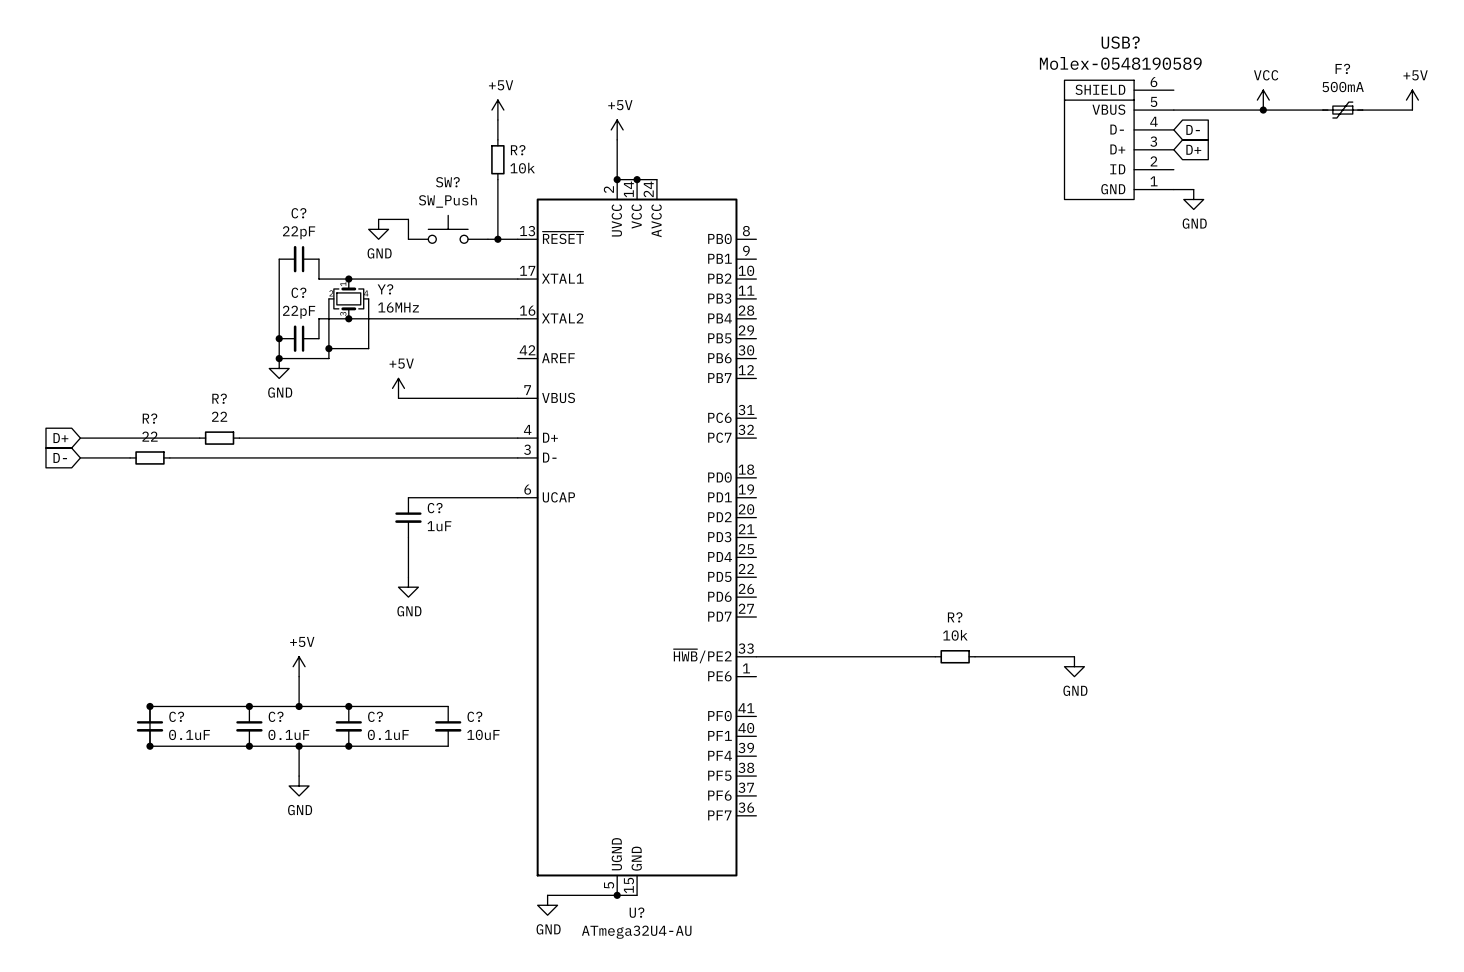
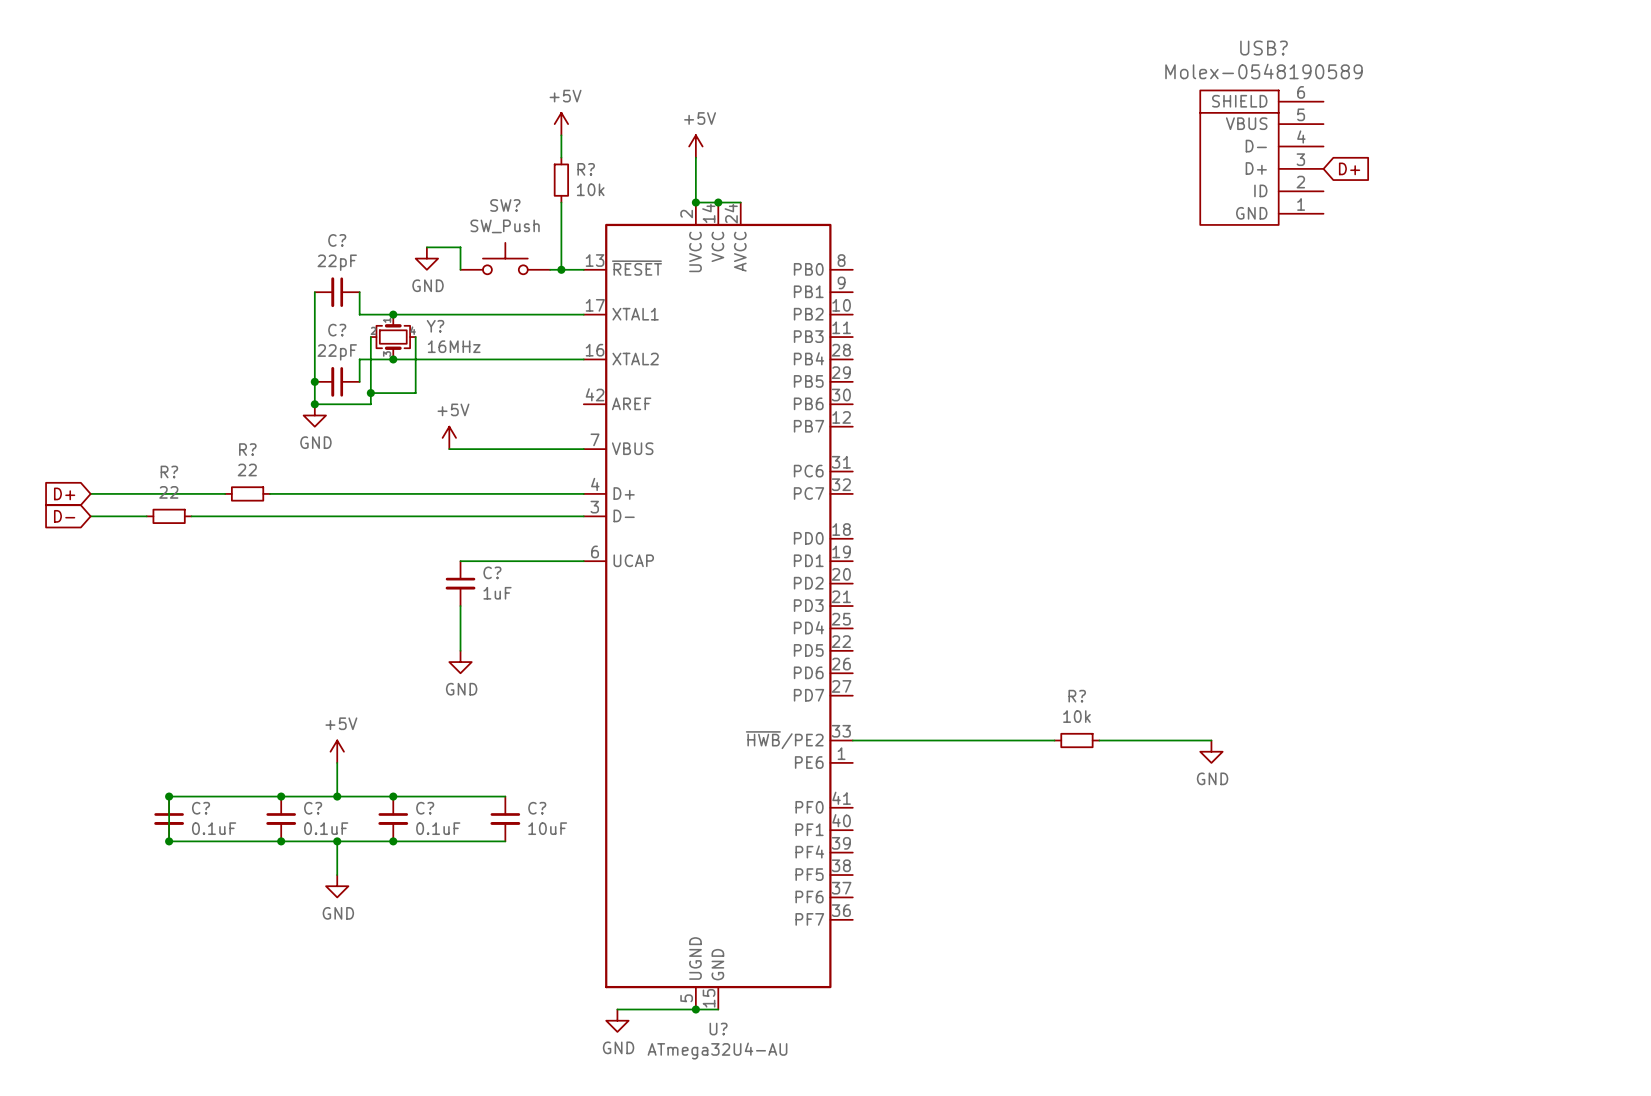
power symbol: VCC (1263, 100) -> none
power symbol: +5V (1412, 100) -> none
wire: (1173, 110) (1322, 110) -> none
junction: (1263, 110) -> none
F?: 500mA (1342, 110) -> none
wire: (1362, 110) (1412, 110) -> none
global label: D- (1193, 129) -> none
wire: (1173, 189) (1193, 189) -> none
power symbol: GND (1193, 199) -> none

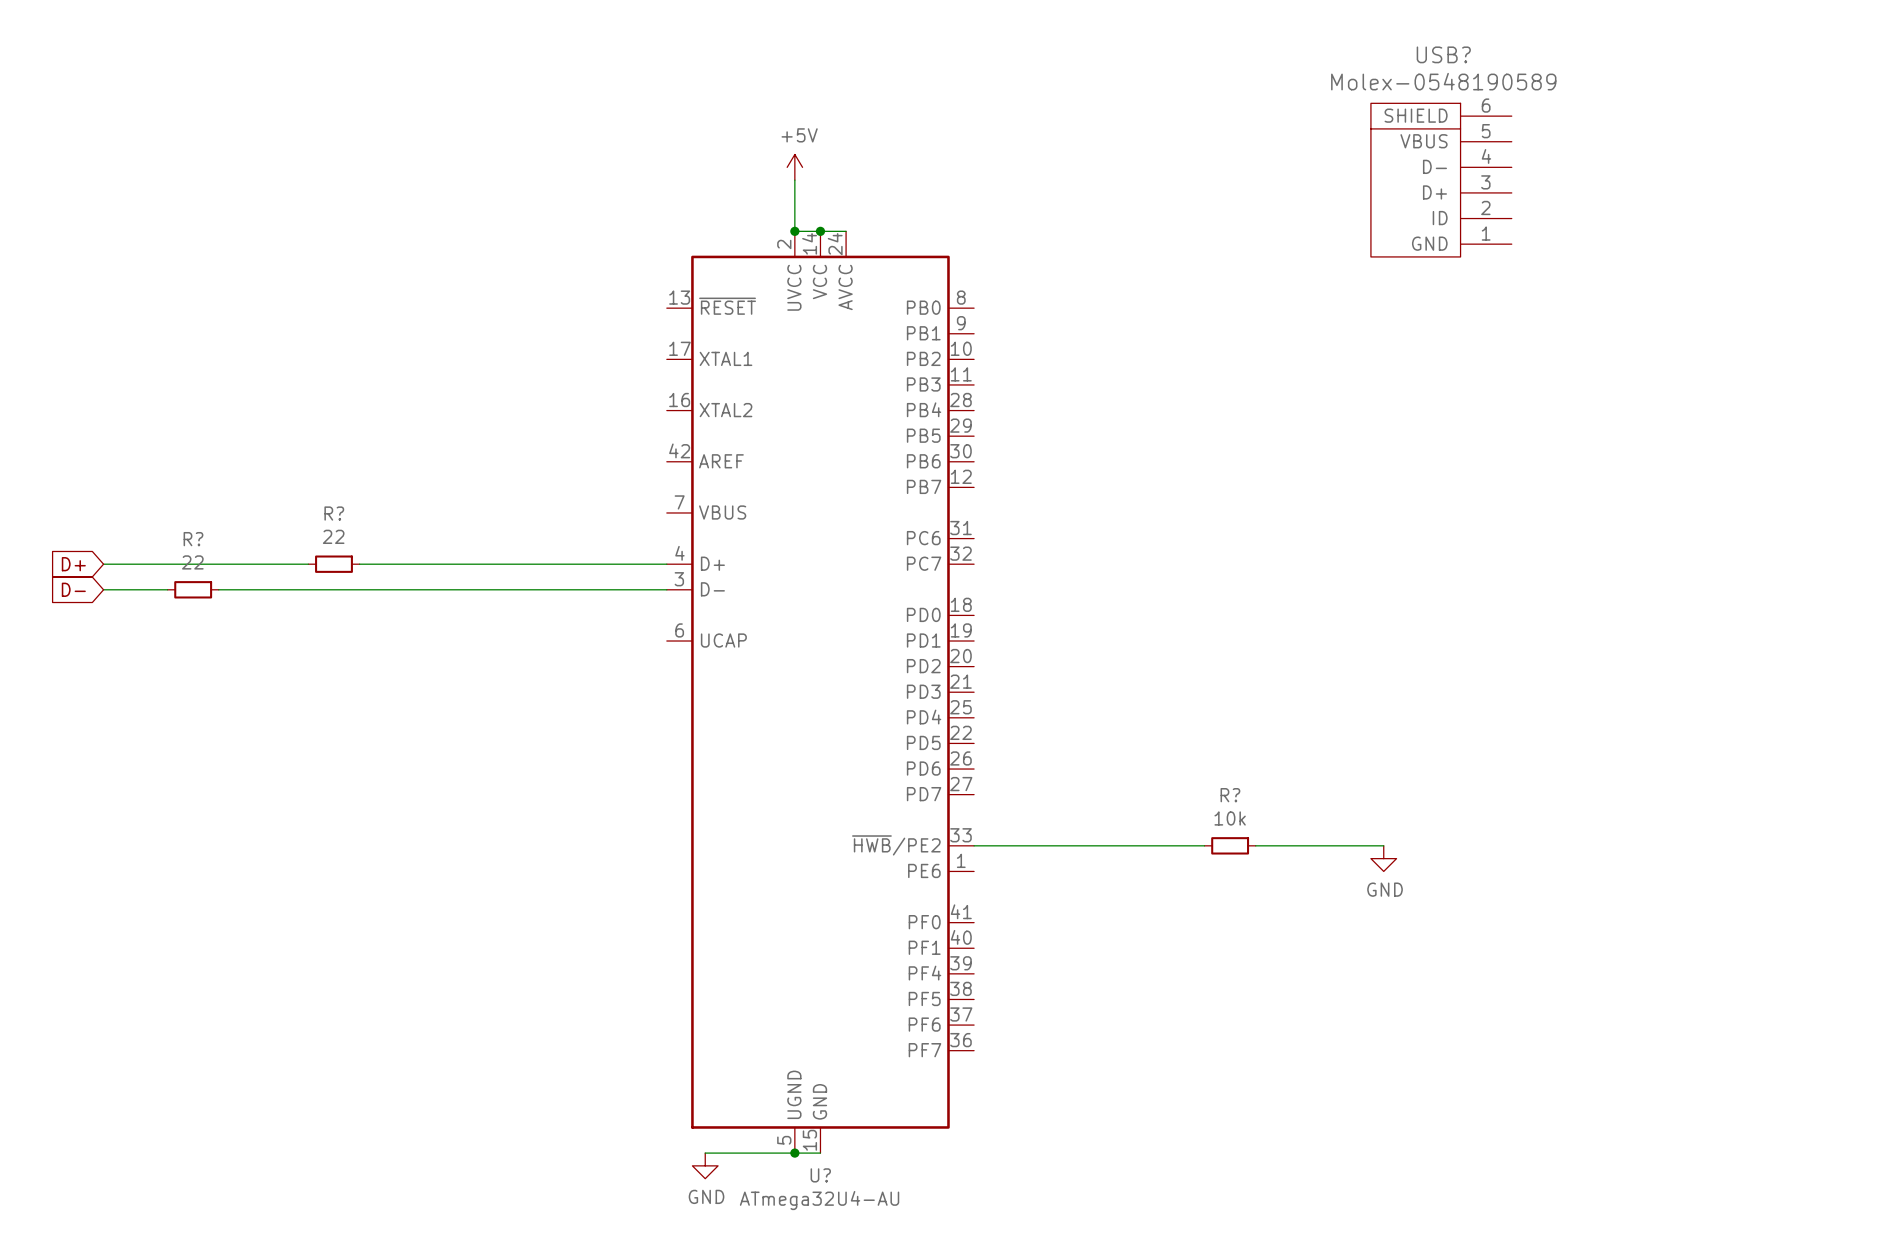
power symbol: +5V (561, 124) -> none
wire: (561, 135) (561, 157) -> none
global label: D+ (1349, 168) -> none
R?: 10k (561, 180) -> none
wire: (561, 202) (561, 269) -> none
wire: (426, 247) (460, 247) (460, 269) -> none
power symbol: GND (426, 258) -> none
SW?: SW_Push (505, 258) -> none
wire: (550, 269) (583, 269) -> none
junction: (561, 269) -> none
wire: (314, 292) (314, 404) (370, 404) (370, 337) -> none
C?: 22pF (337, 292) -> none
wire: (359, 292) (359, 314) (583, 314) -> none
junction: (393, 314) -> none
Y?: 16MHz (393, 337) -> none
wire: (415, 337) (415, 393) (370, 393) -> none
junction: (393, 359) -> none
wire: (583, 359) (359, 359) (359, 381) -> none
junction: (314, 381) -> none
C?: 22pF (337, 381) -> none
junction: (370, 393) -> none
junction: (314, 404) -> none
power symbol: GND (314, 415) -> none
power symbol: +5V (449, 437) -> none
wire: (449, 449) (583, 449) -> none
R? position: (247, 493) -> (333, 564)
wire: (269, 493) (314, 493) -> (308, 564) (257, 564)
wire: (460, 561) (583, 561) -> none
C?: 1uF (460, 583) -> none
wire: (460, 606) (460, 650) -> none
power symbol: GND (460, 662) -> none
power symbol: +5V (337, 751) -> none
wire: (337, 762) (337, 796) -> none
junction: (169, 796) -> none
junction: (281, 796) -> none
junction: (337, 796) -> none
junction: (393, 796) -> none
wire: (505, 796) (169, 796) (169, 841) (505, 841) -> none
C?: 0.1uF (169, 818) -> none
C?: 0.1uF (281, 818) -> none
C?: 0.1uF (393, 818) -> none
C?: 10uF (505, 818) -> none
junction: (169, 841) -> none
junction: (281, 841) -> none
wire: (337, 841) (337, 875) -> none
junction: (337, 841) -> none
junction: (393, 841) -> none
power symbol: GND (337, 886) -> none

